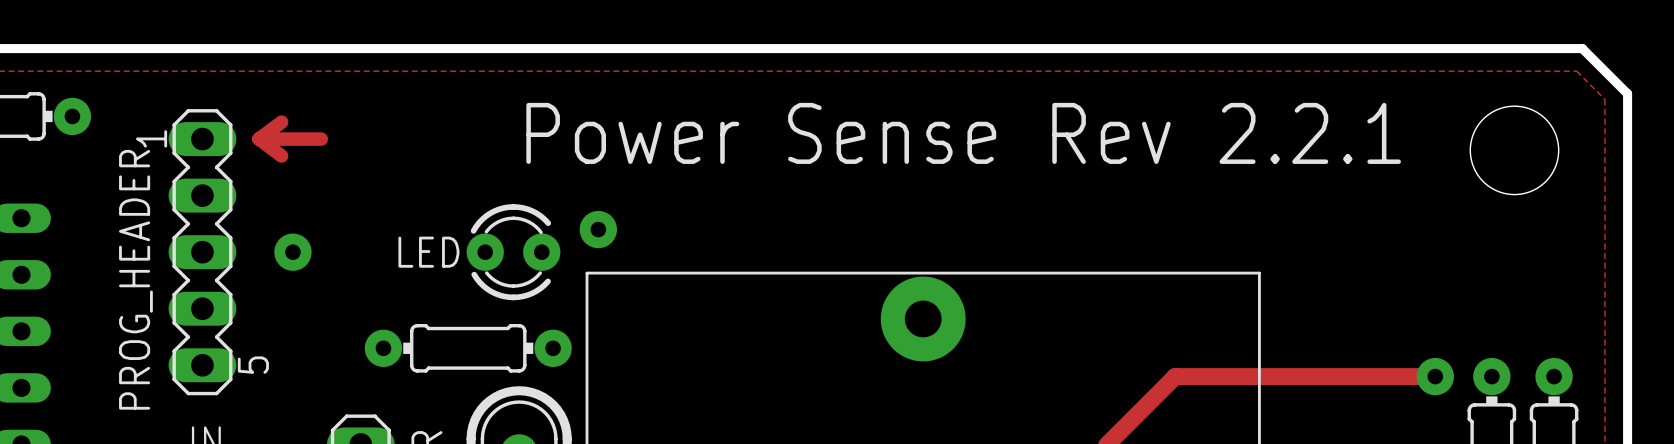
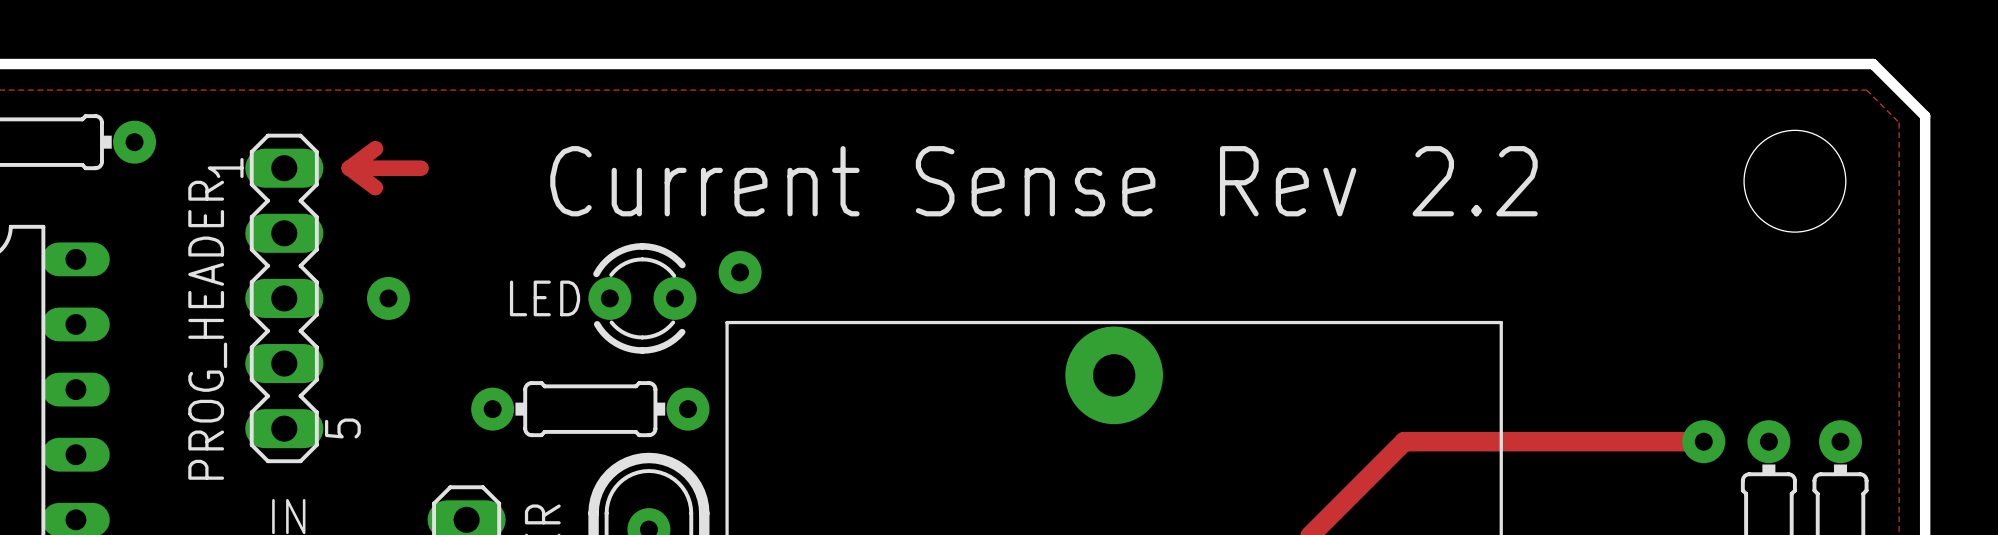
text: Power Sense Rev 2.2.1 (963, 133) -> Current Sense Rev 2.2 (1043, 181)

